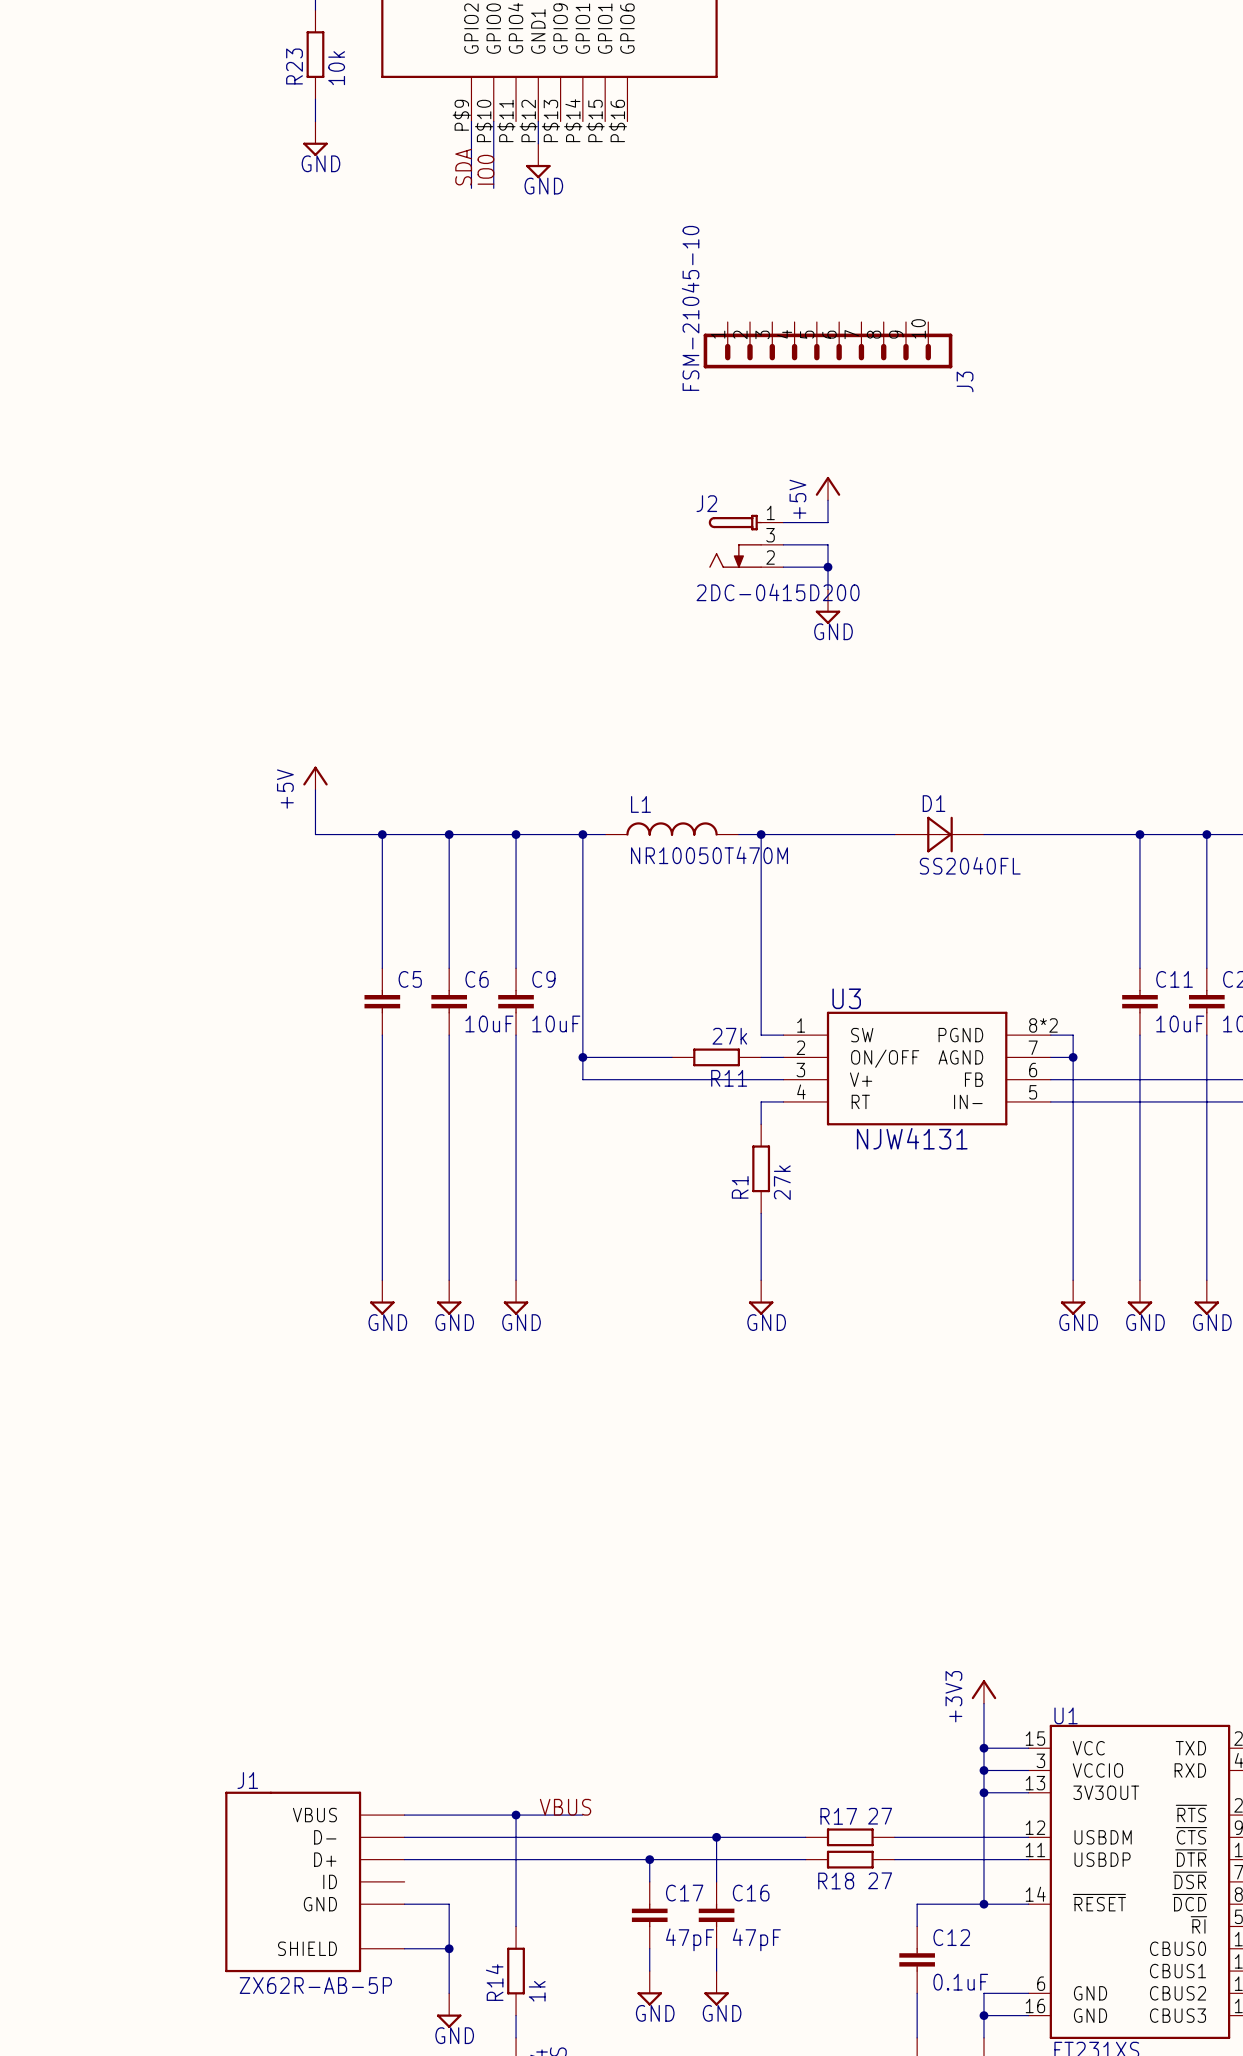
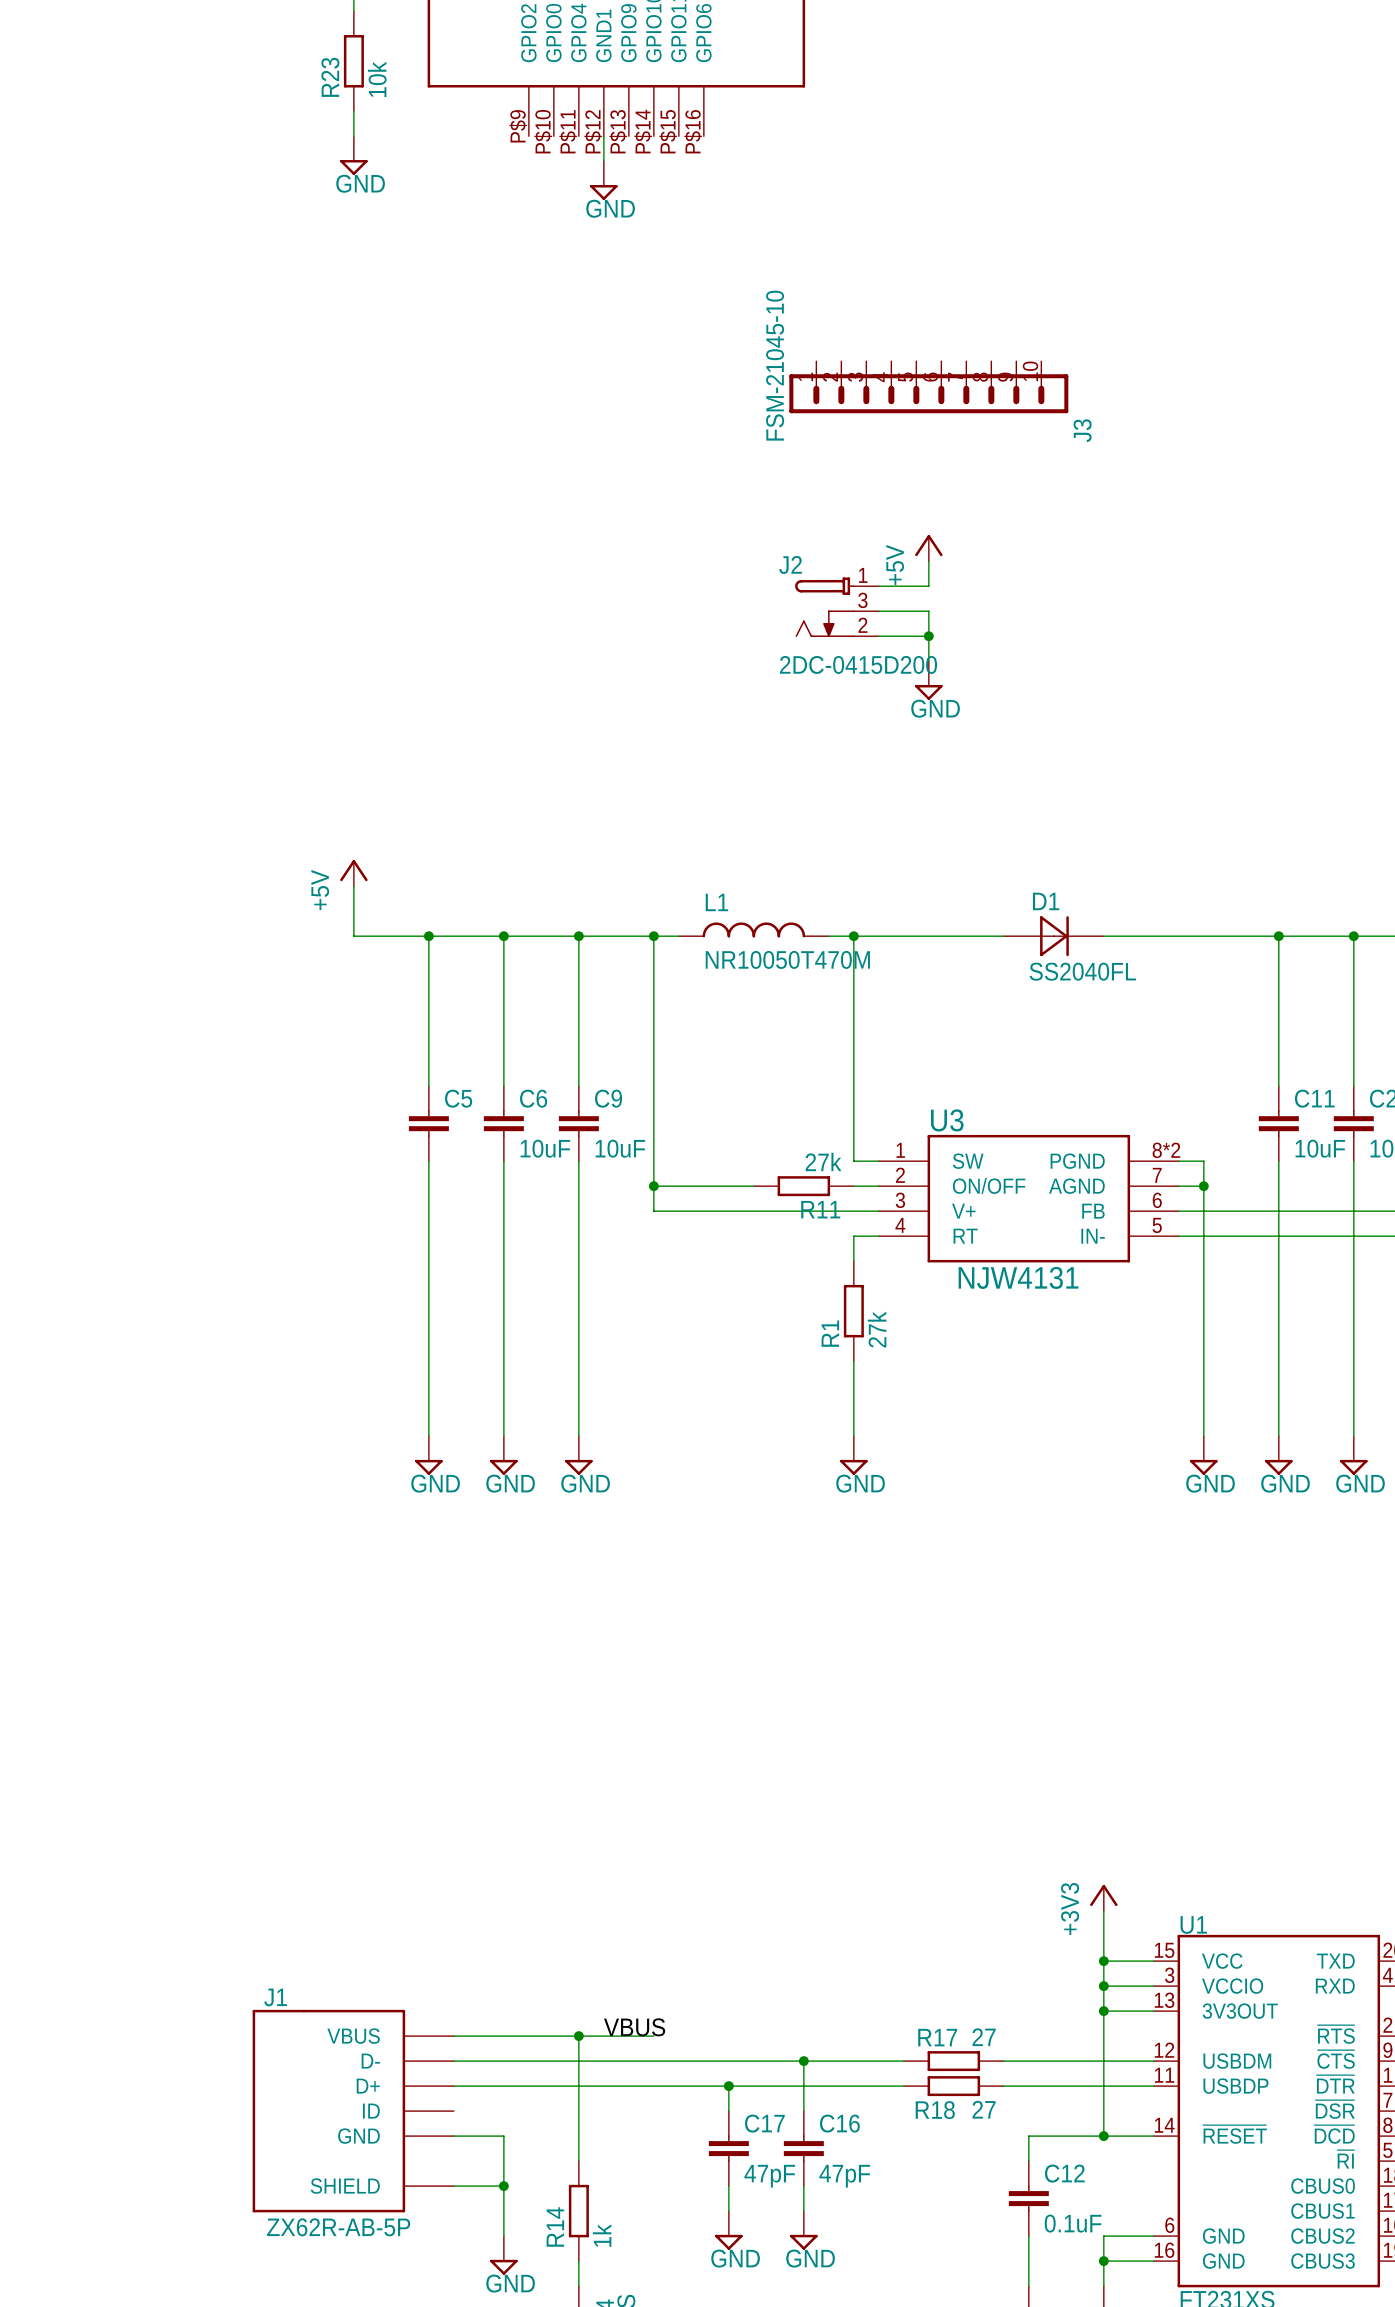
wire: (471, 121) (471, 188) -> none
wire: (493, 121) (493, 188) -> none
label: SDA (463, 167) -> none
label: IO0 (485, 169) -> none

